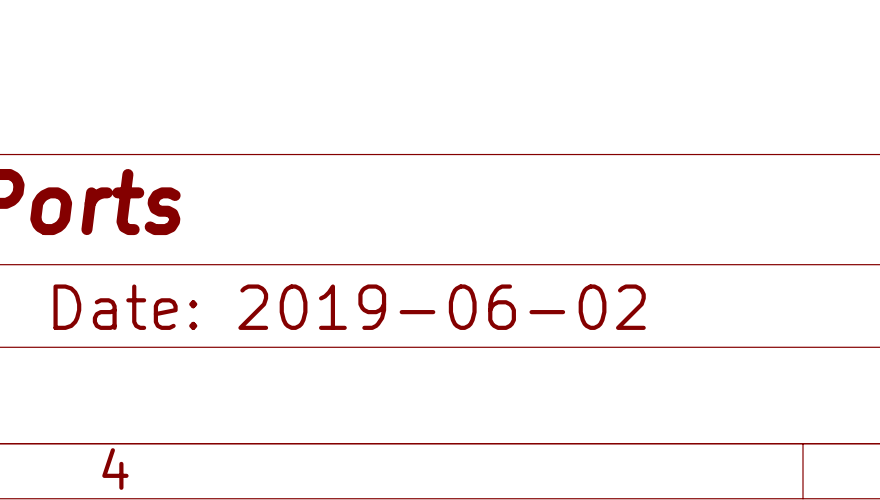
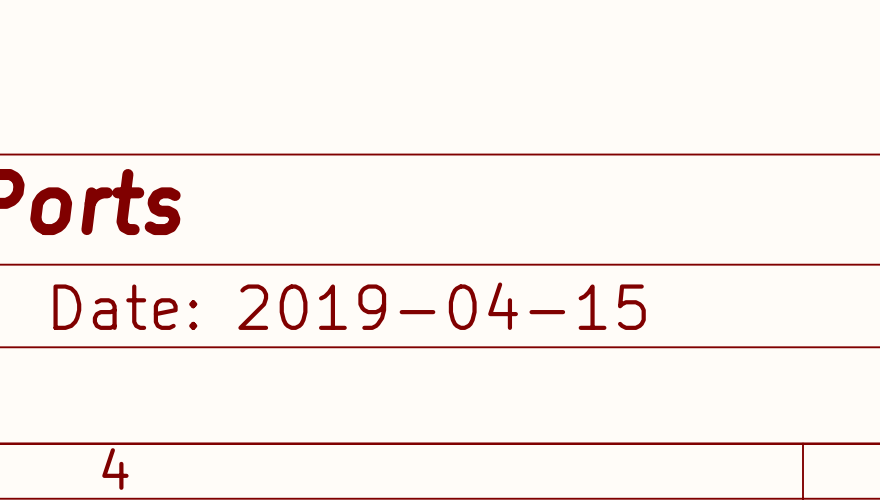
title block: Date: 2019-06-02 (349, 307) -> Date: 2019-04-15 (349, 306)

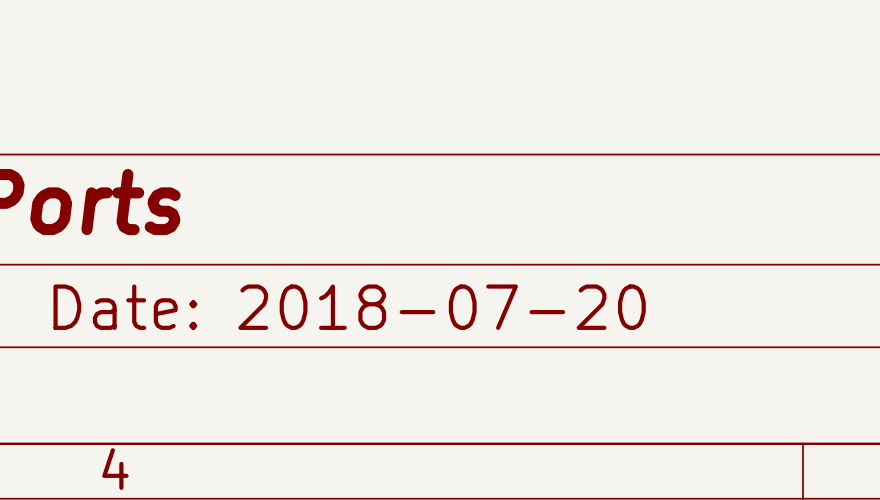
title block: Date: 2019-04-15 (349, 306) -> Date: 2018-07-20 (349, 307)

